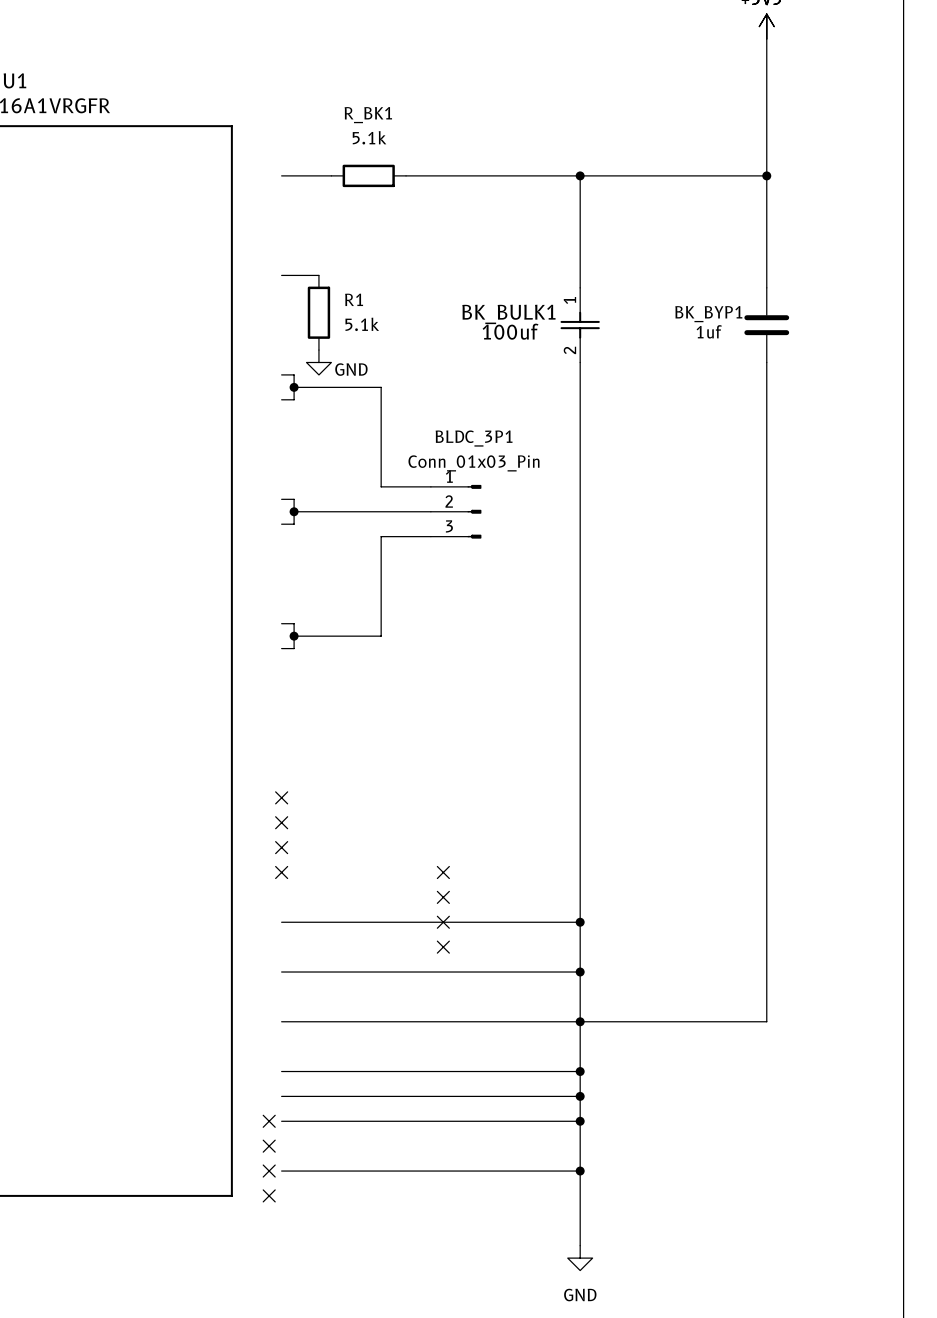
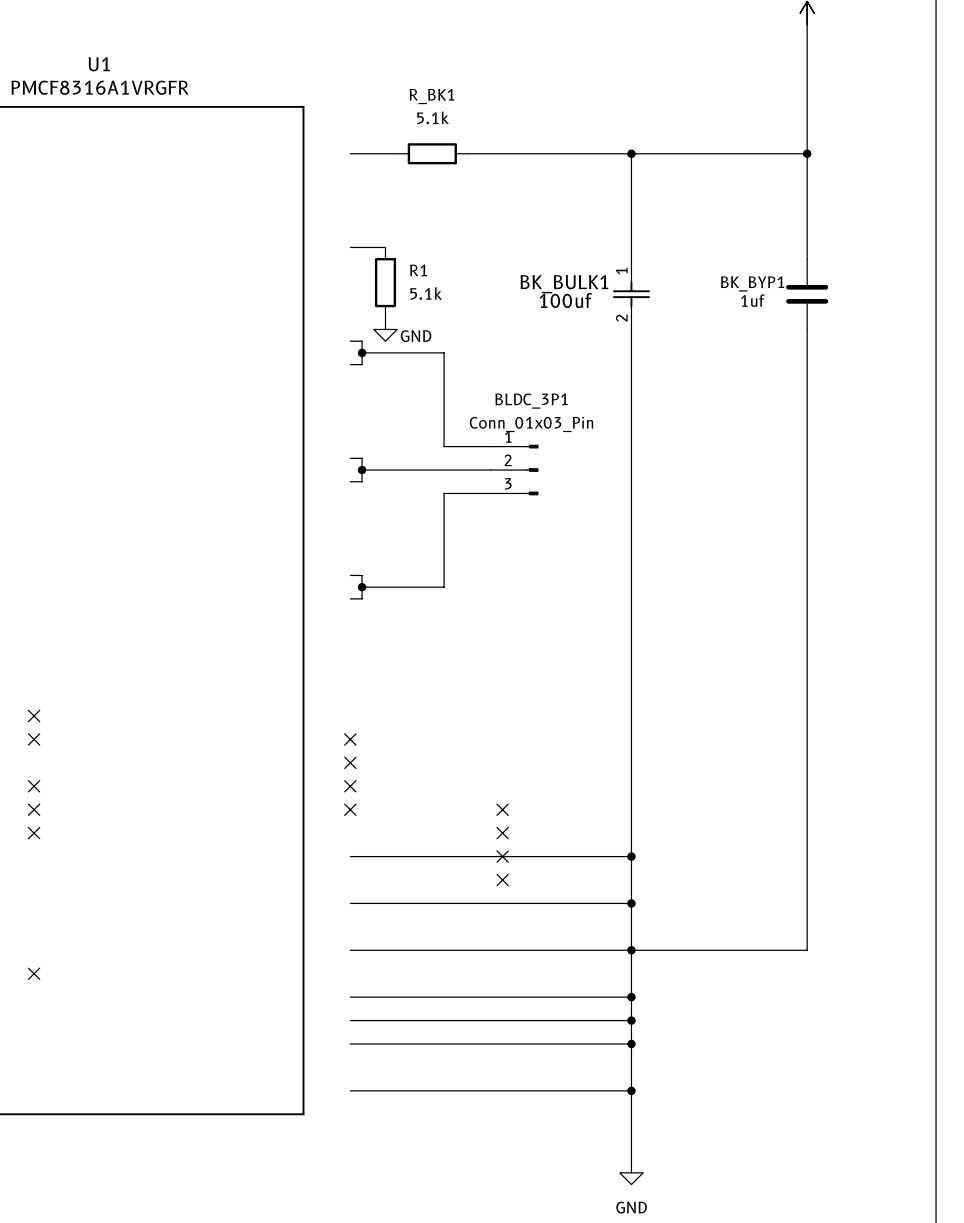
no-connect mark: (269, 1121) -> none
no-connect mark: (269, 1146) -> none
no-connect mark: (269, 1171) -> none
no-connect mark: (269, 1195) -> none

